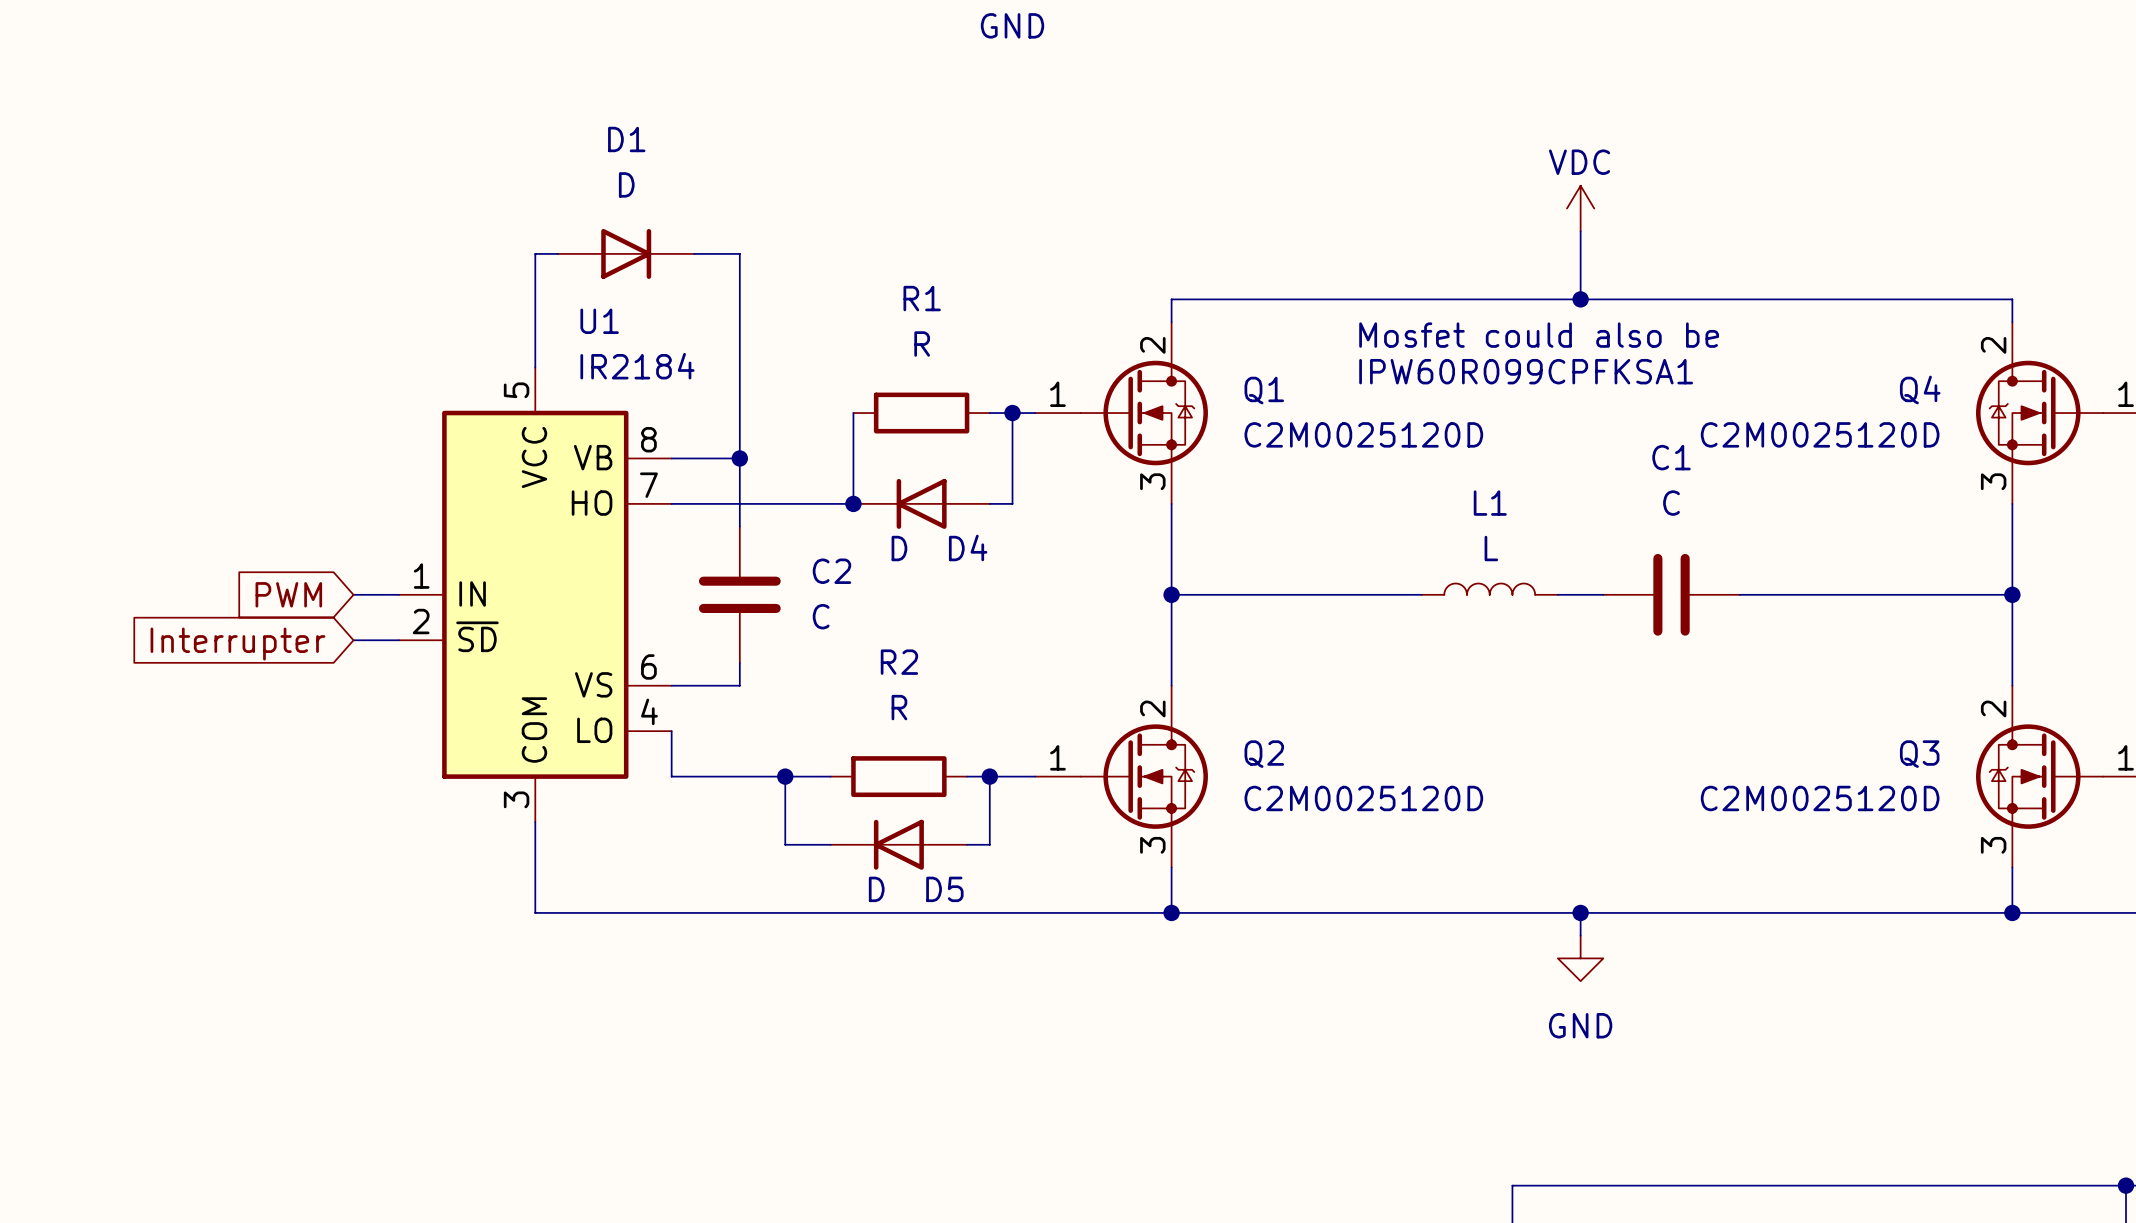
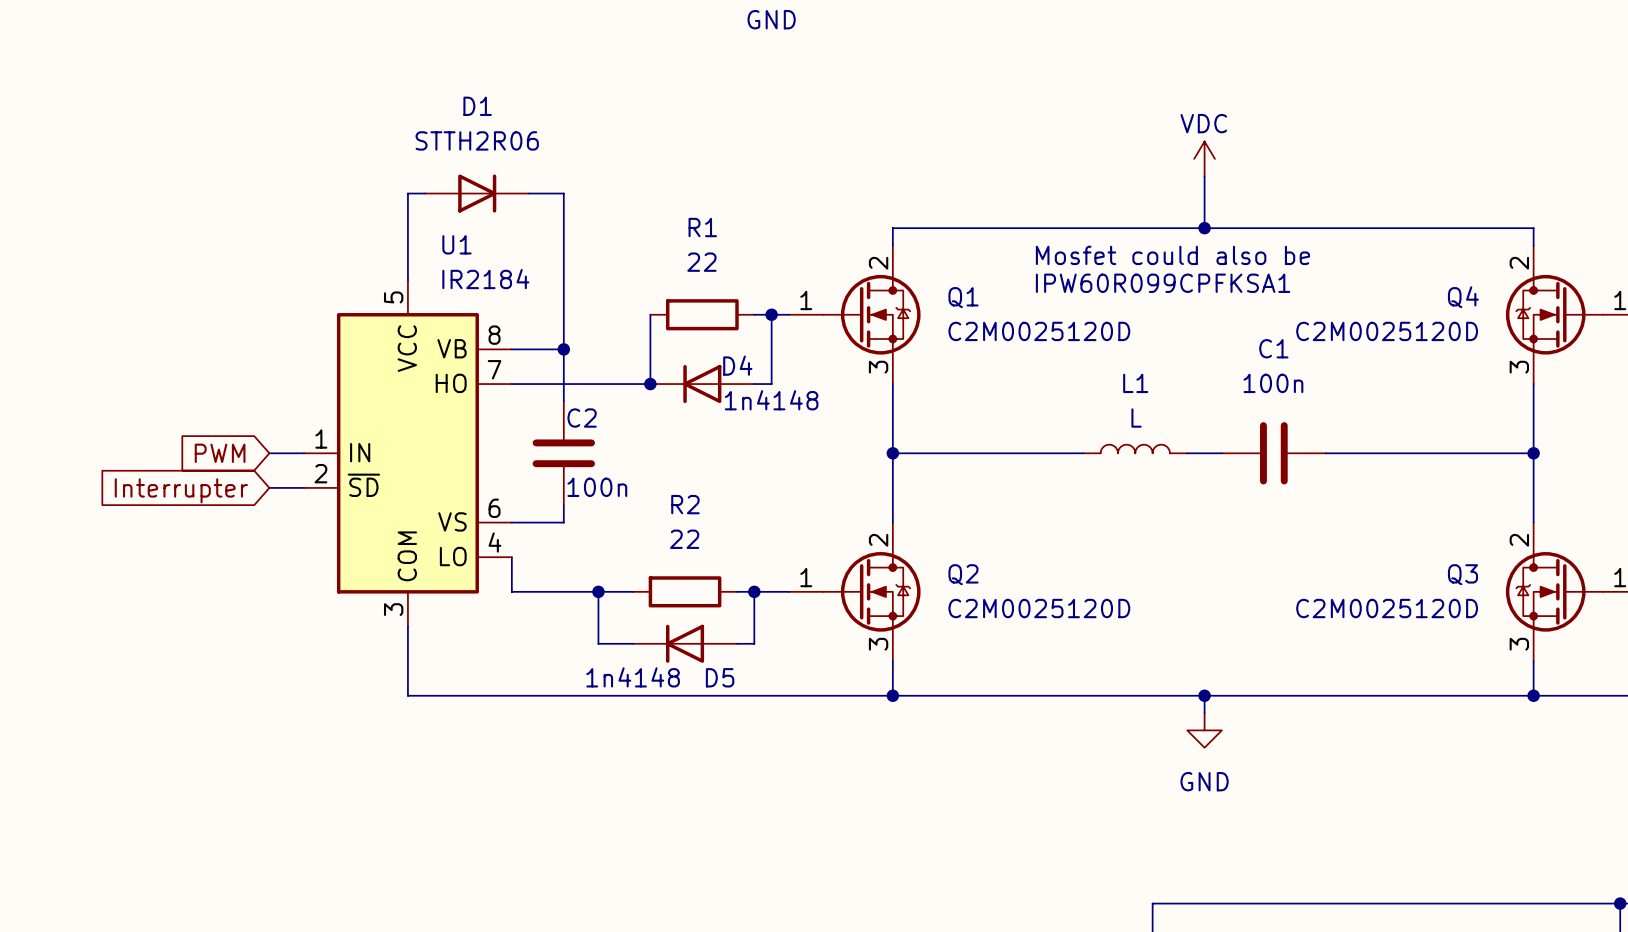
D1 value: D (626, 184) -> STTH2R06 (477, 140)
R1 value: R (922, 344) -> 22 (701, 262)
C1 value: C (1671, 503) -> 100n (1273, 383)
D4 name position: D4 (968, 547) -> D4 (737, 365)
D4 value: D (899, 548) -> 1n4148 (771, 400)
C2 name position: C2 (831, 571) -> C2 (582, 418)
C2 value: C (821, 616) -> 100n (597, 487)
R2 value: R (899, 707) -> 22 (684, 539)
D5 value: D (876, 889) -> 1n4148 (633, 677)

